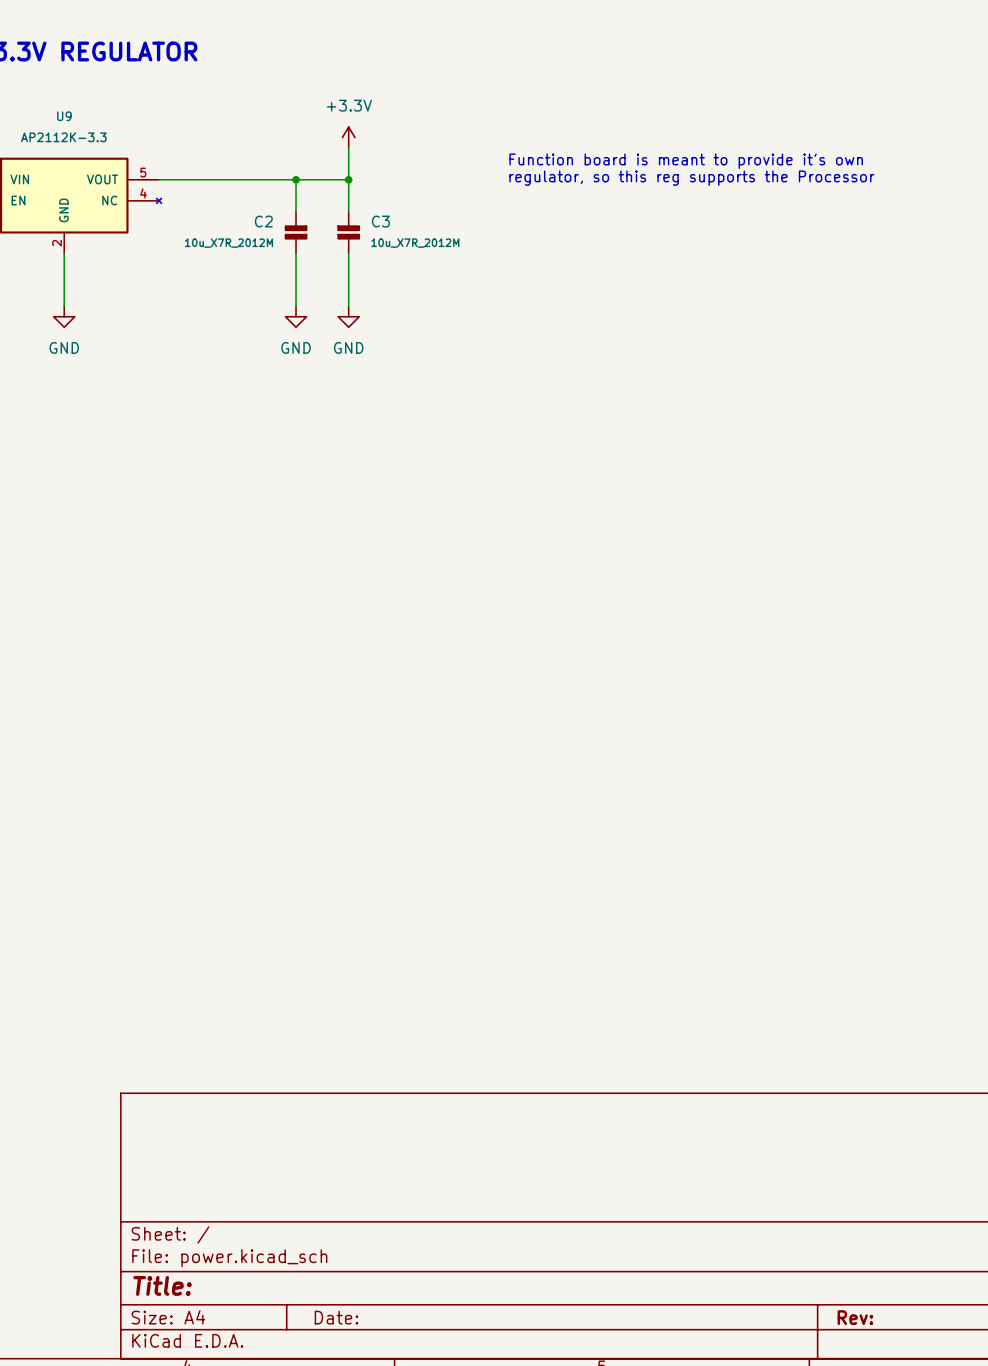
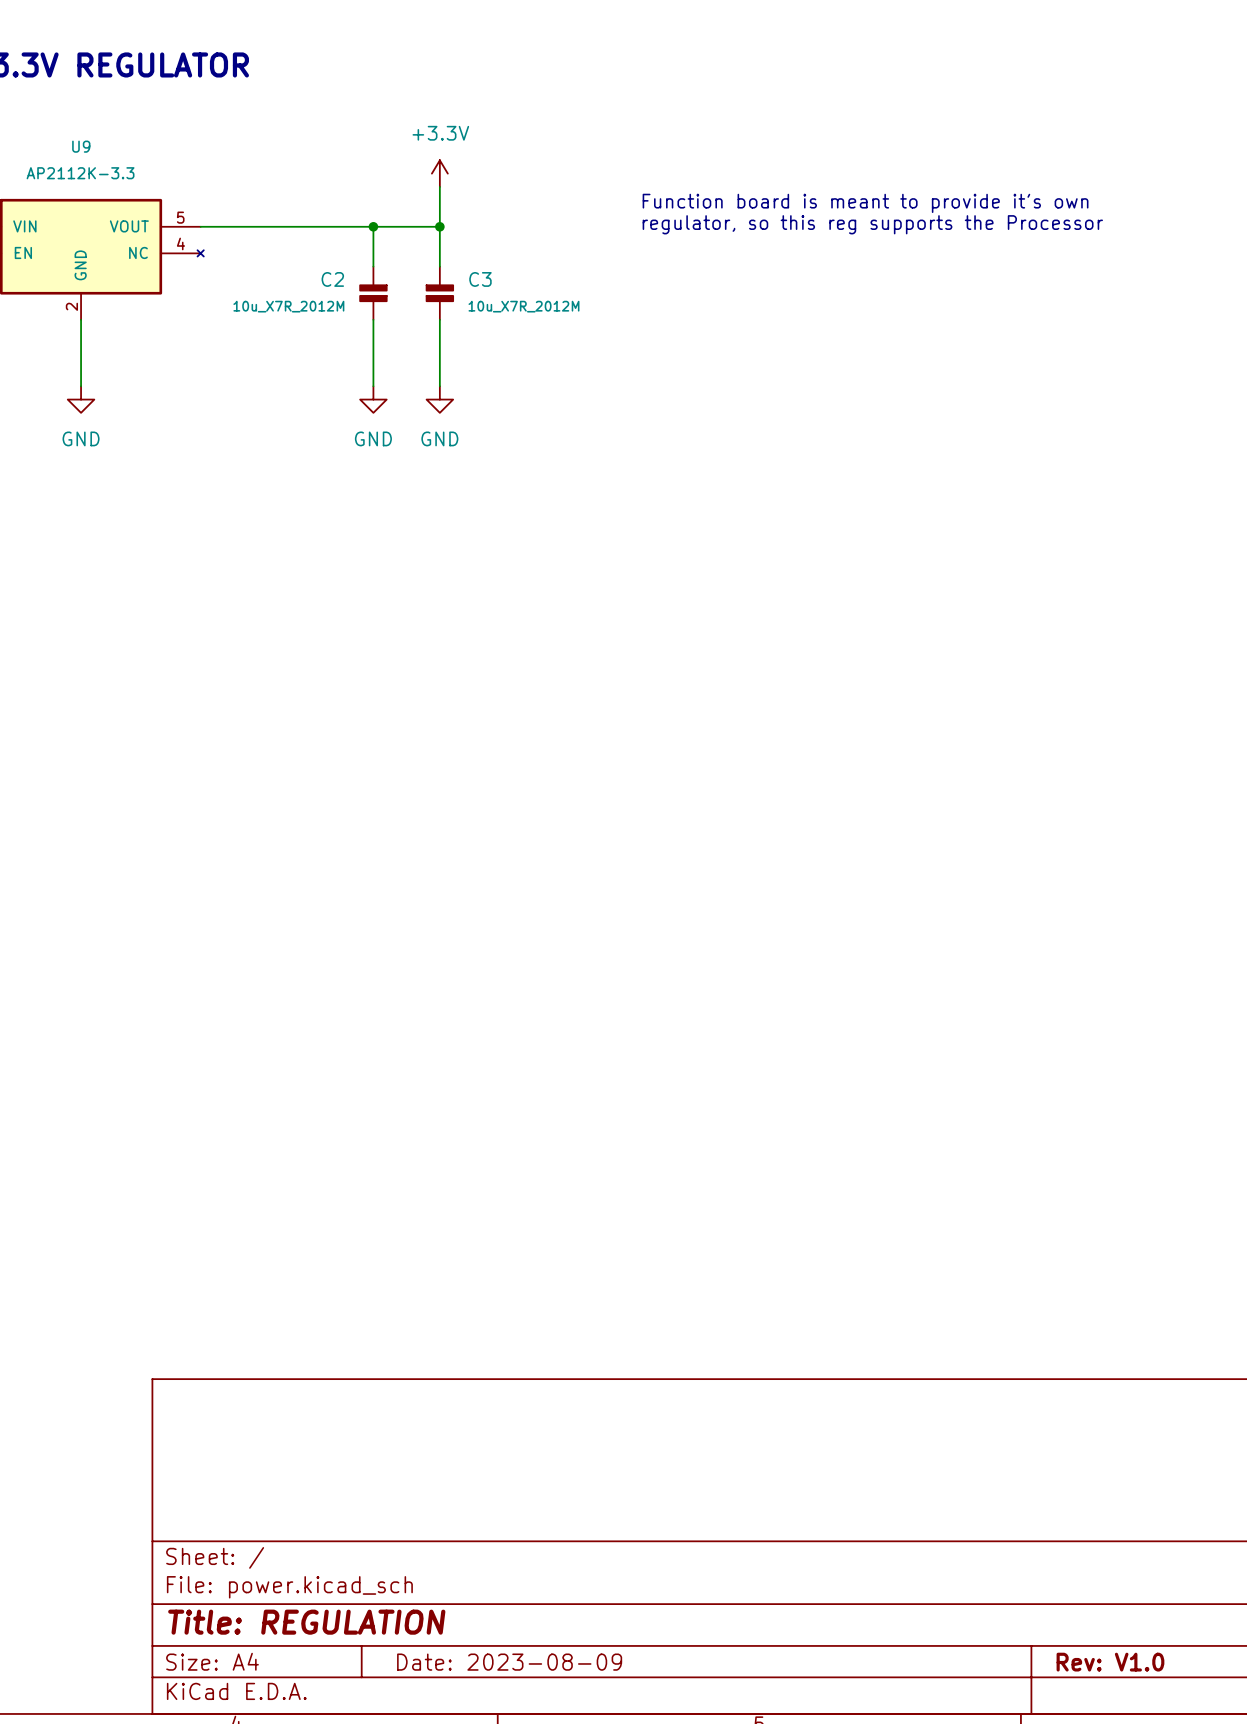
title block: Title: (162, 1285) -> Title: REGULATION (306, 1622)
title block: Date: (336, 1317) -> Date: 2023-08-09 (509, 1662)
title block: Rev: (855, 1317) -> Rev: V1.0 (1110, 1662)

